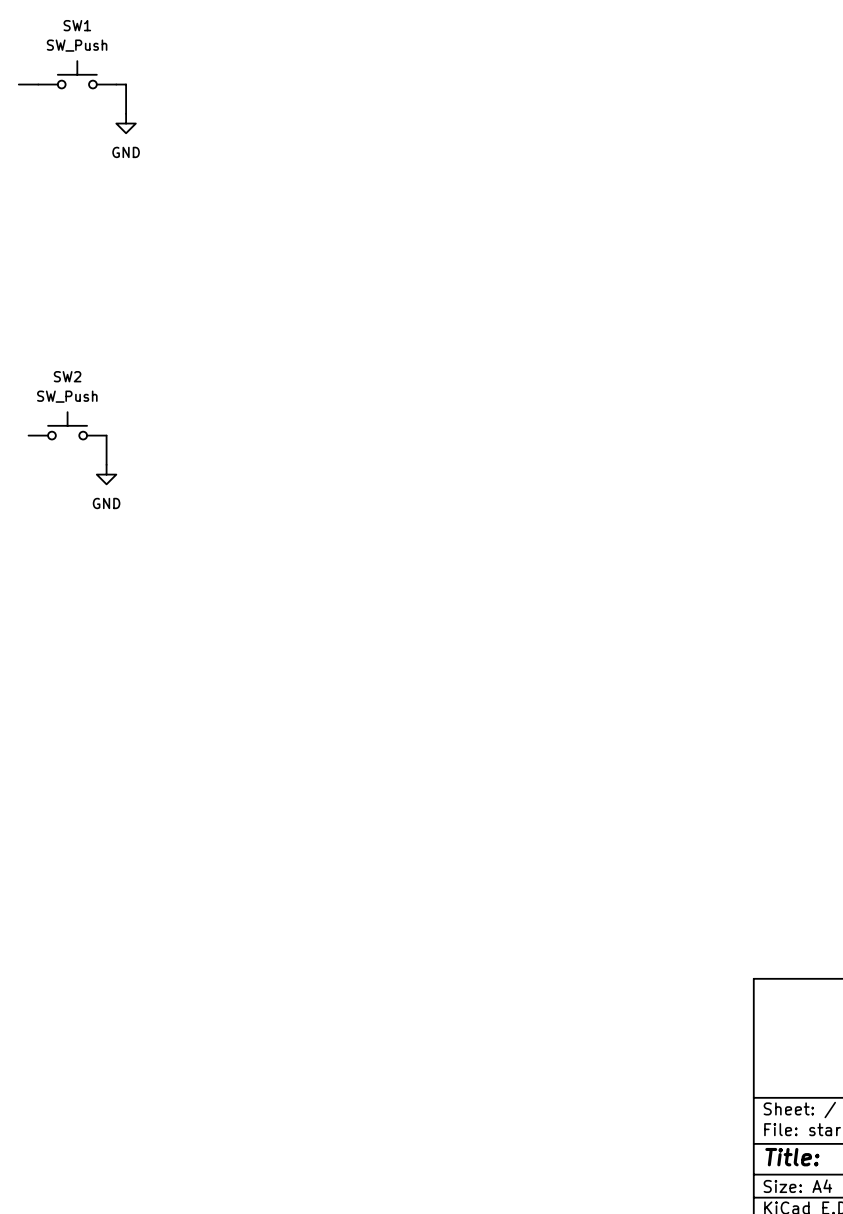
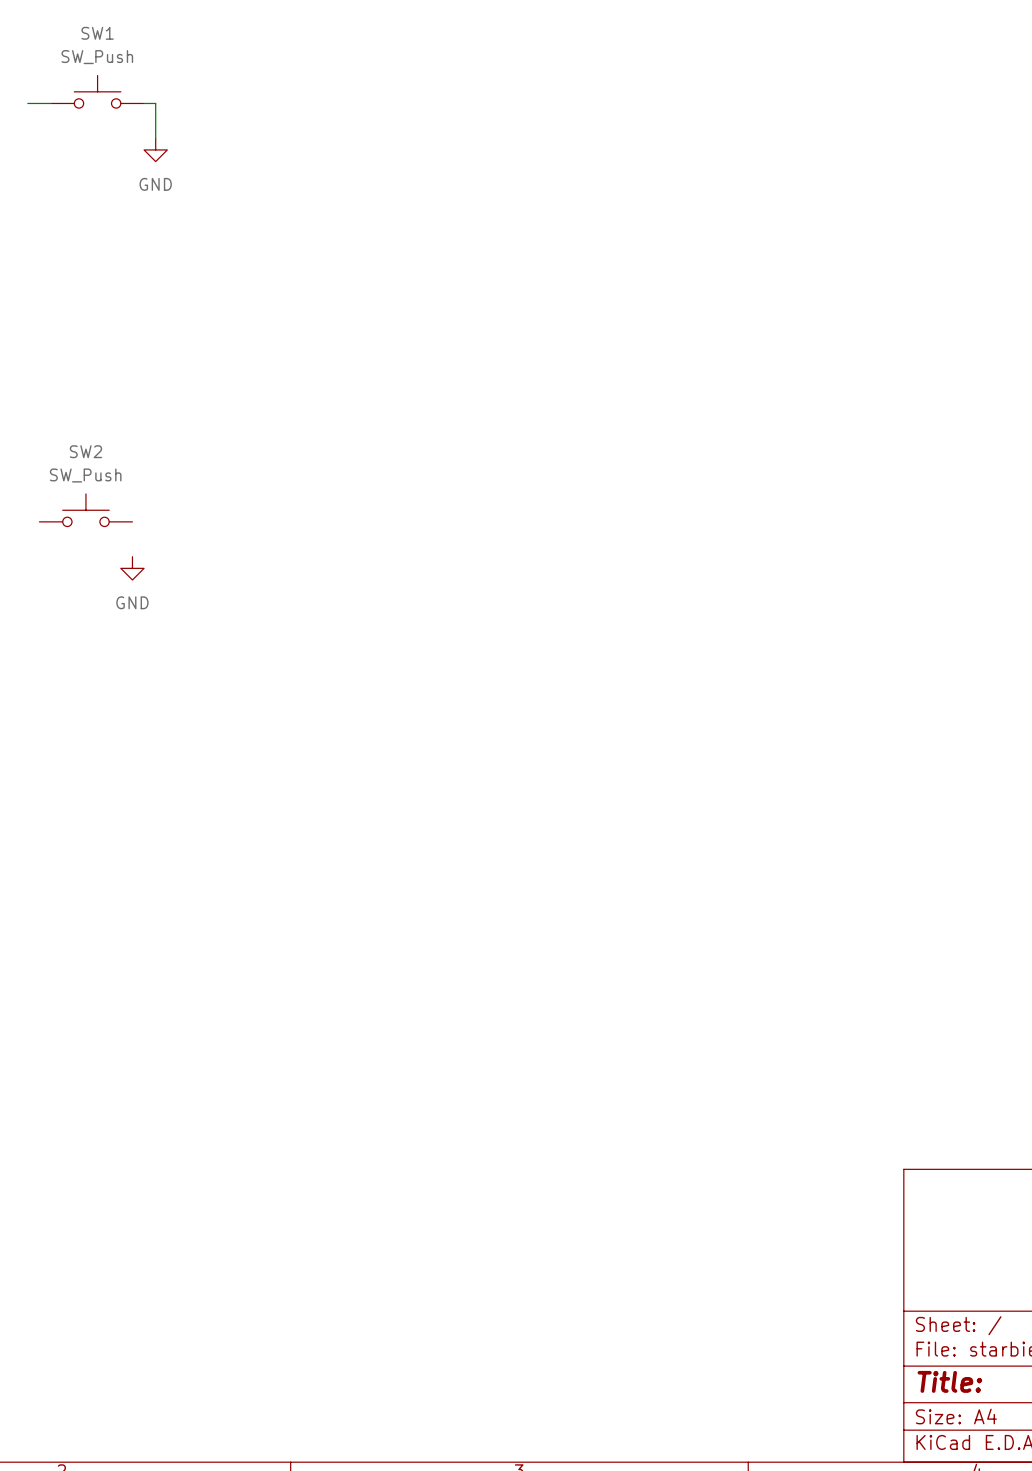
wire: (106, 435) (106, 464) -> none

